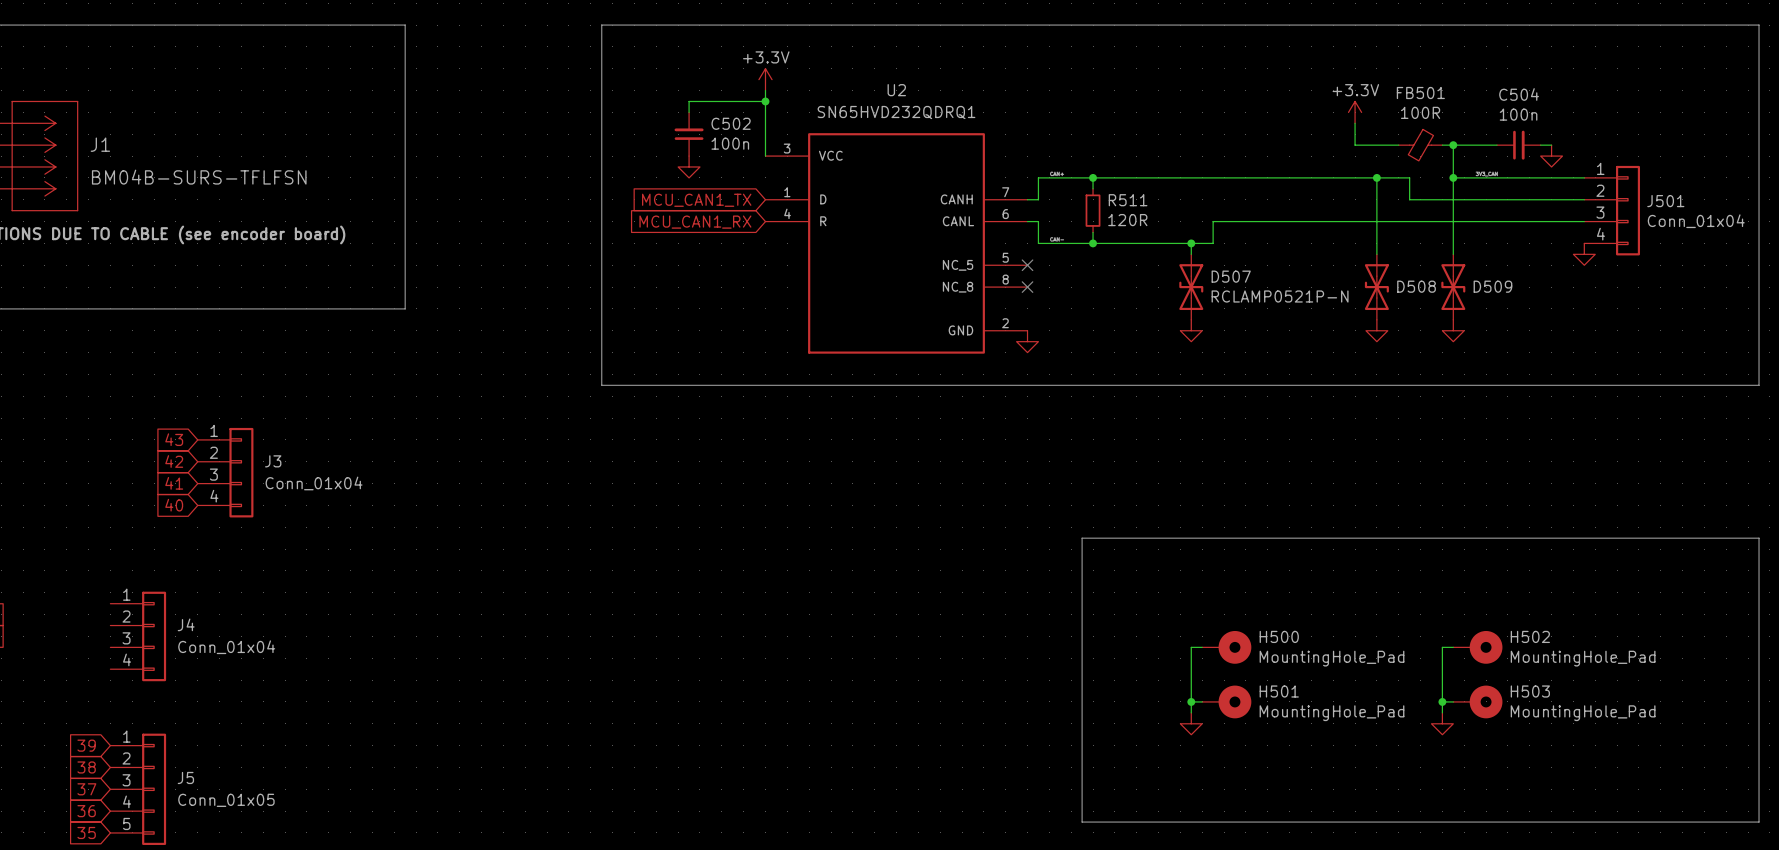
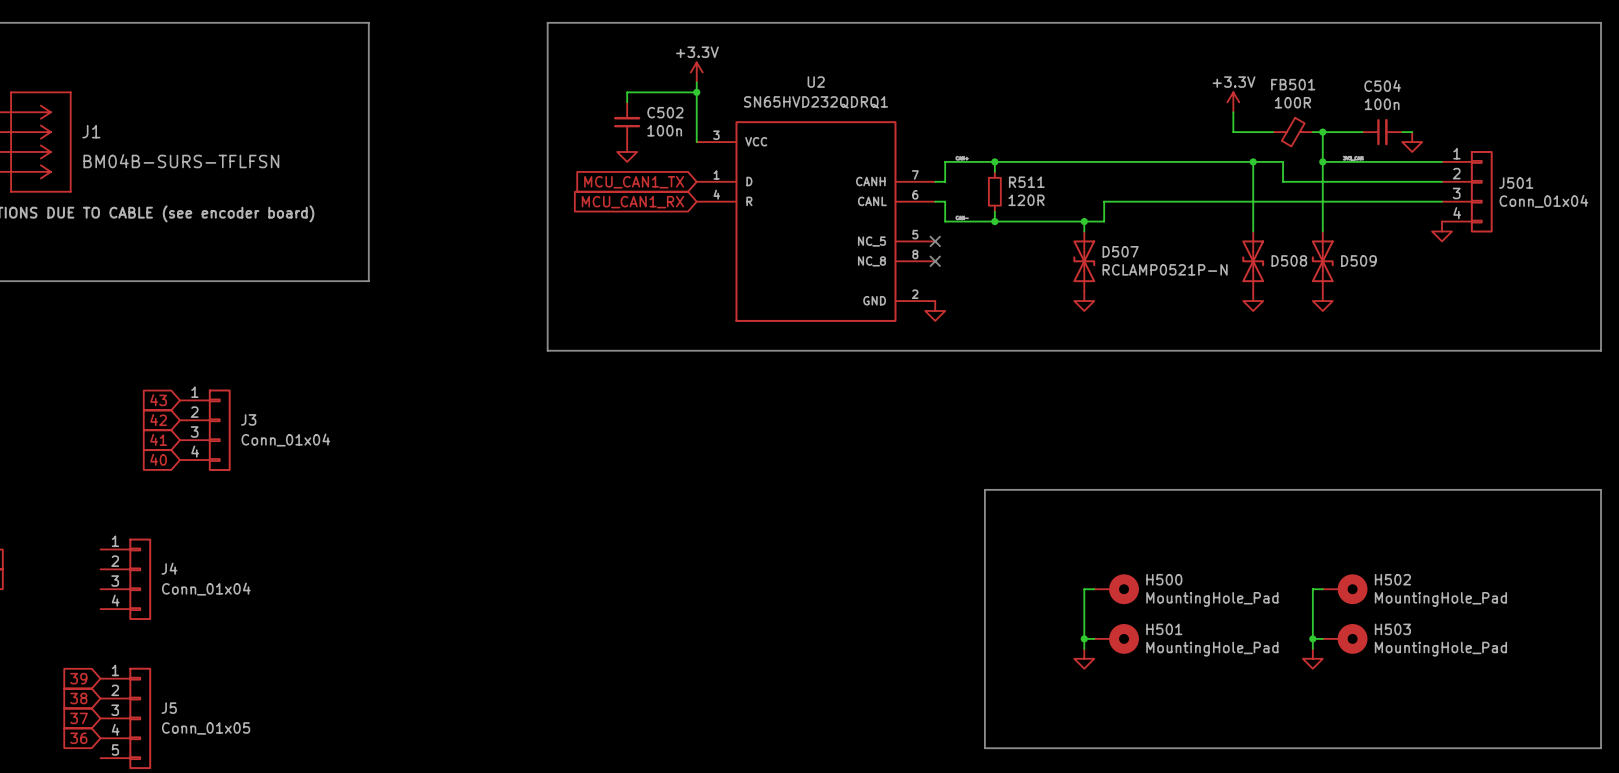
global label: 35 (86, 832) -> none

